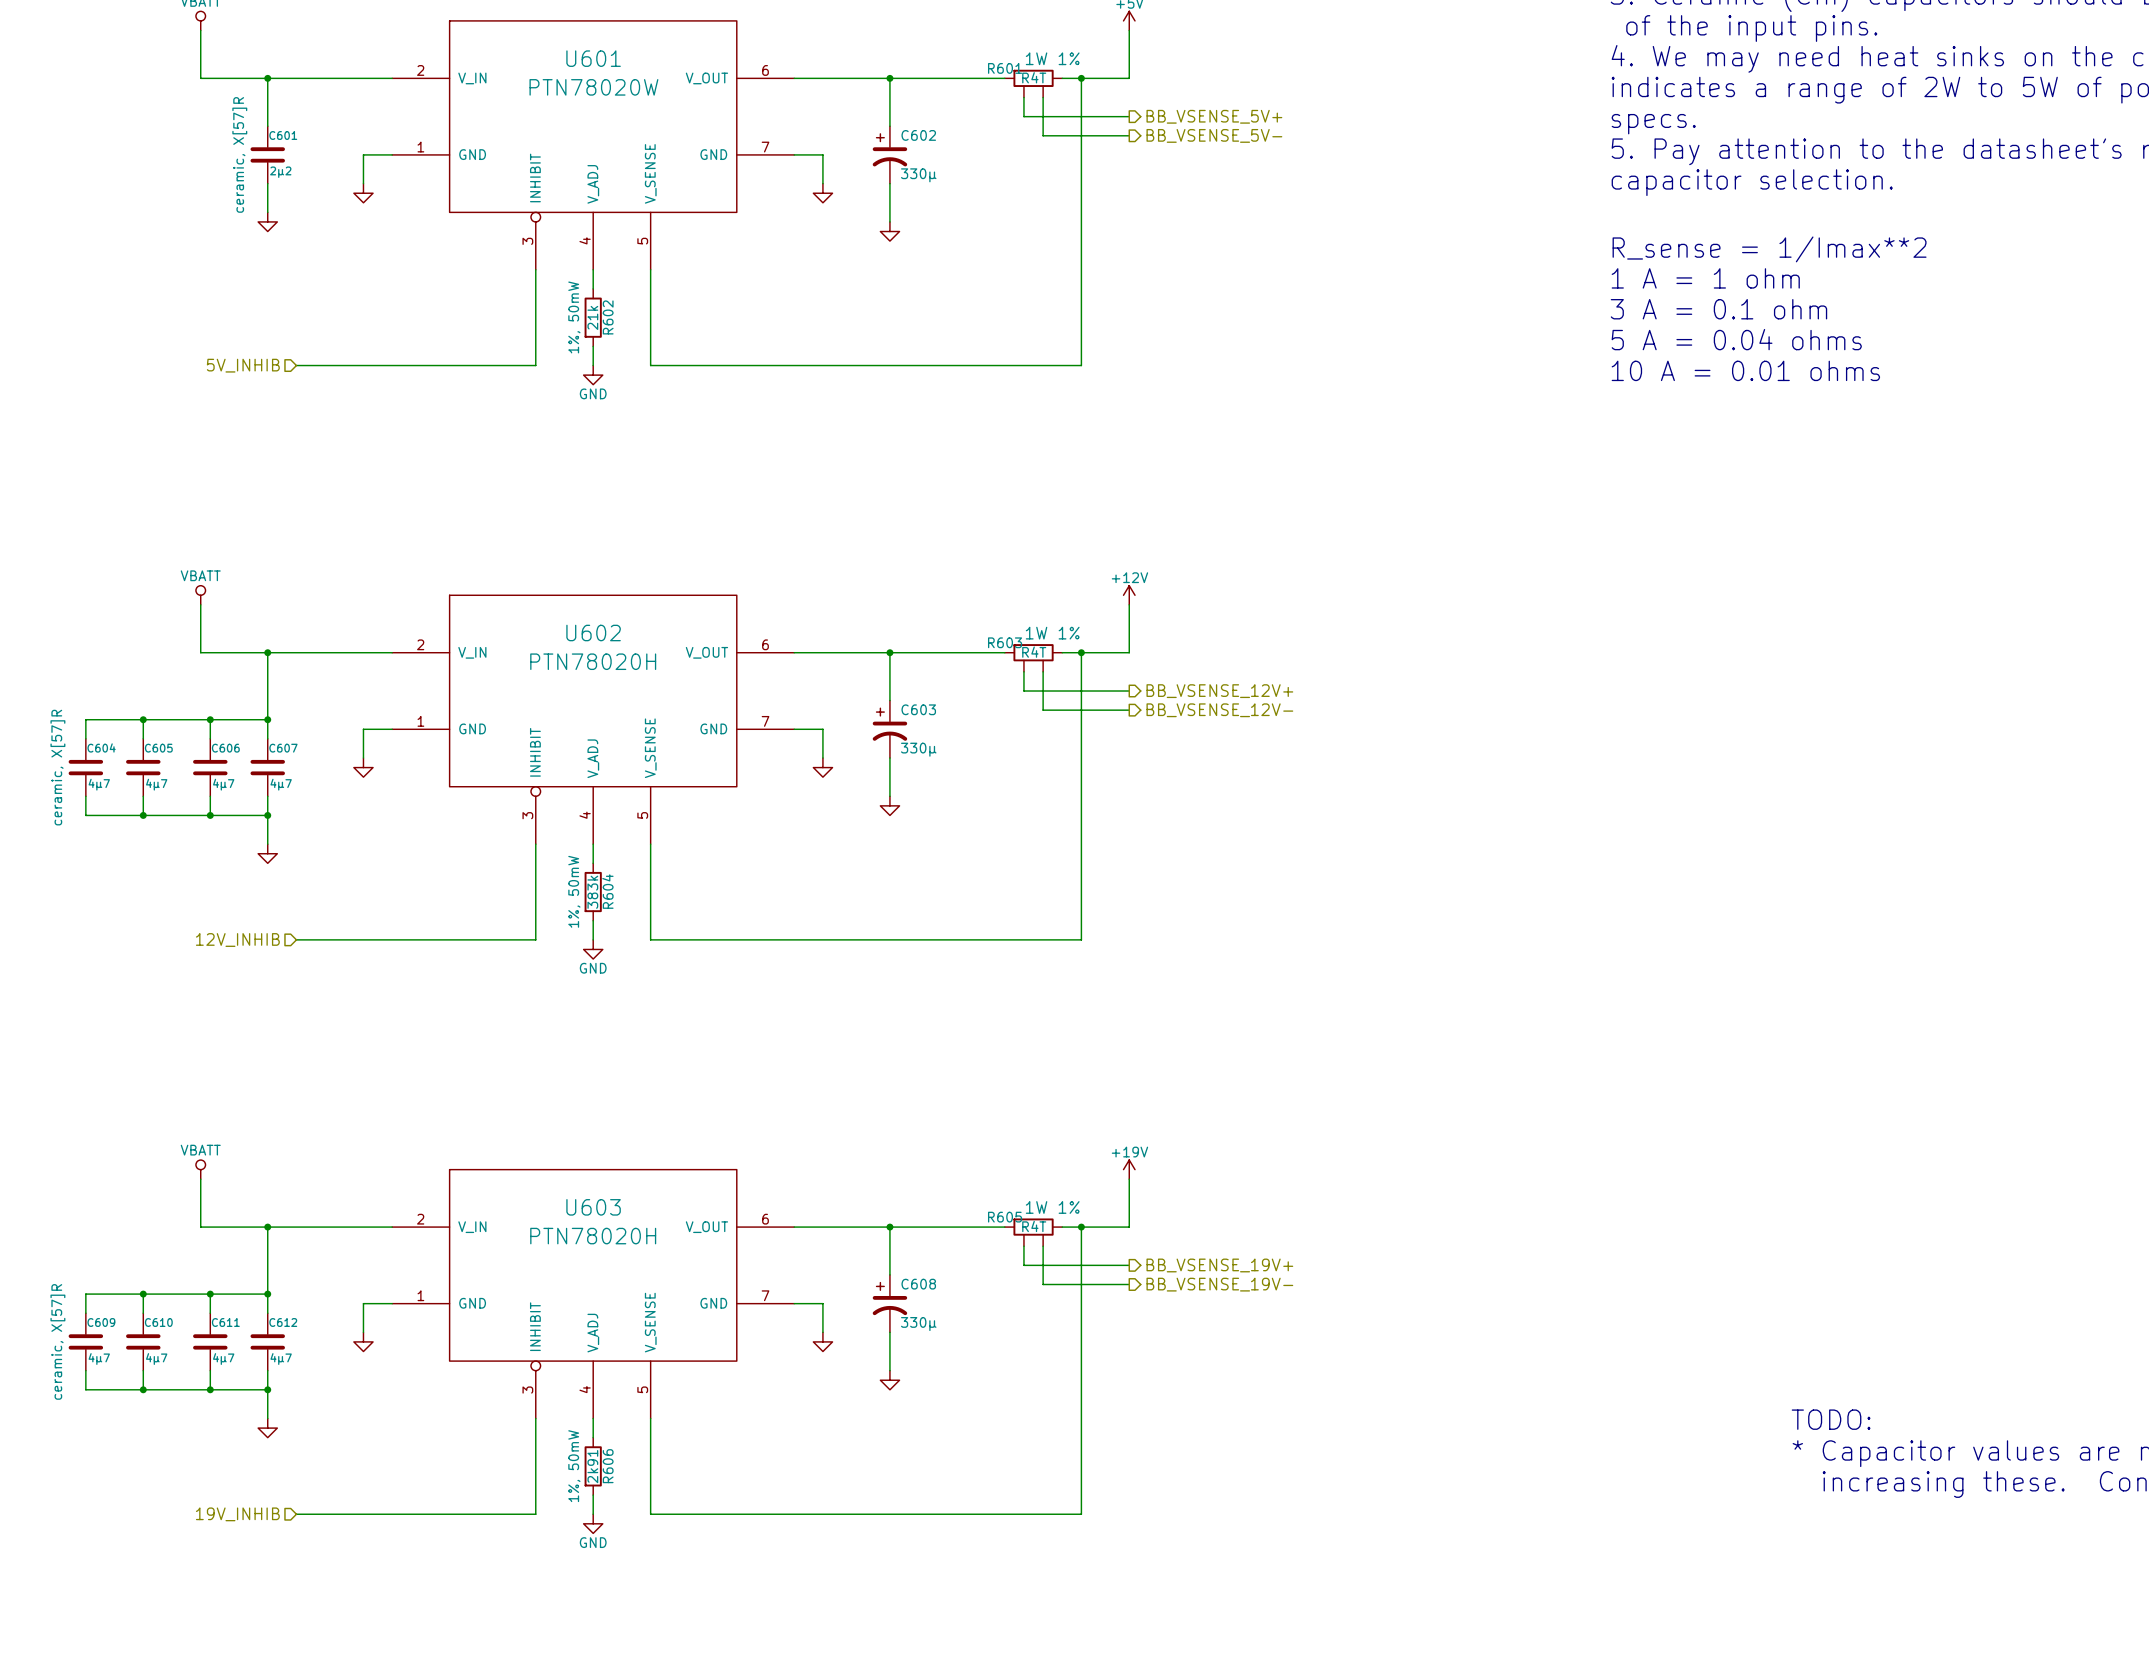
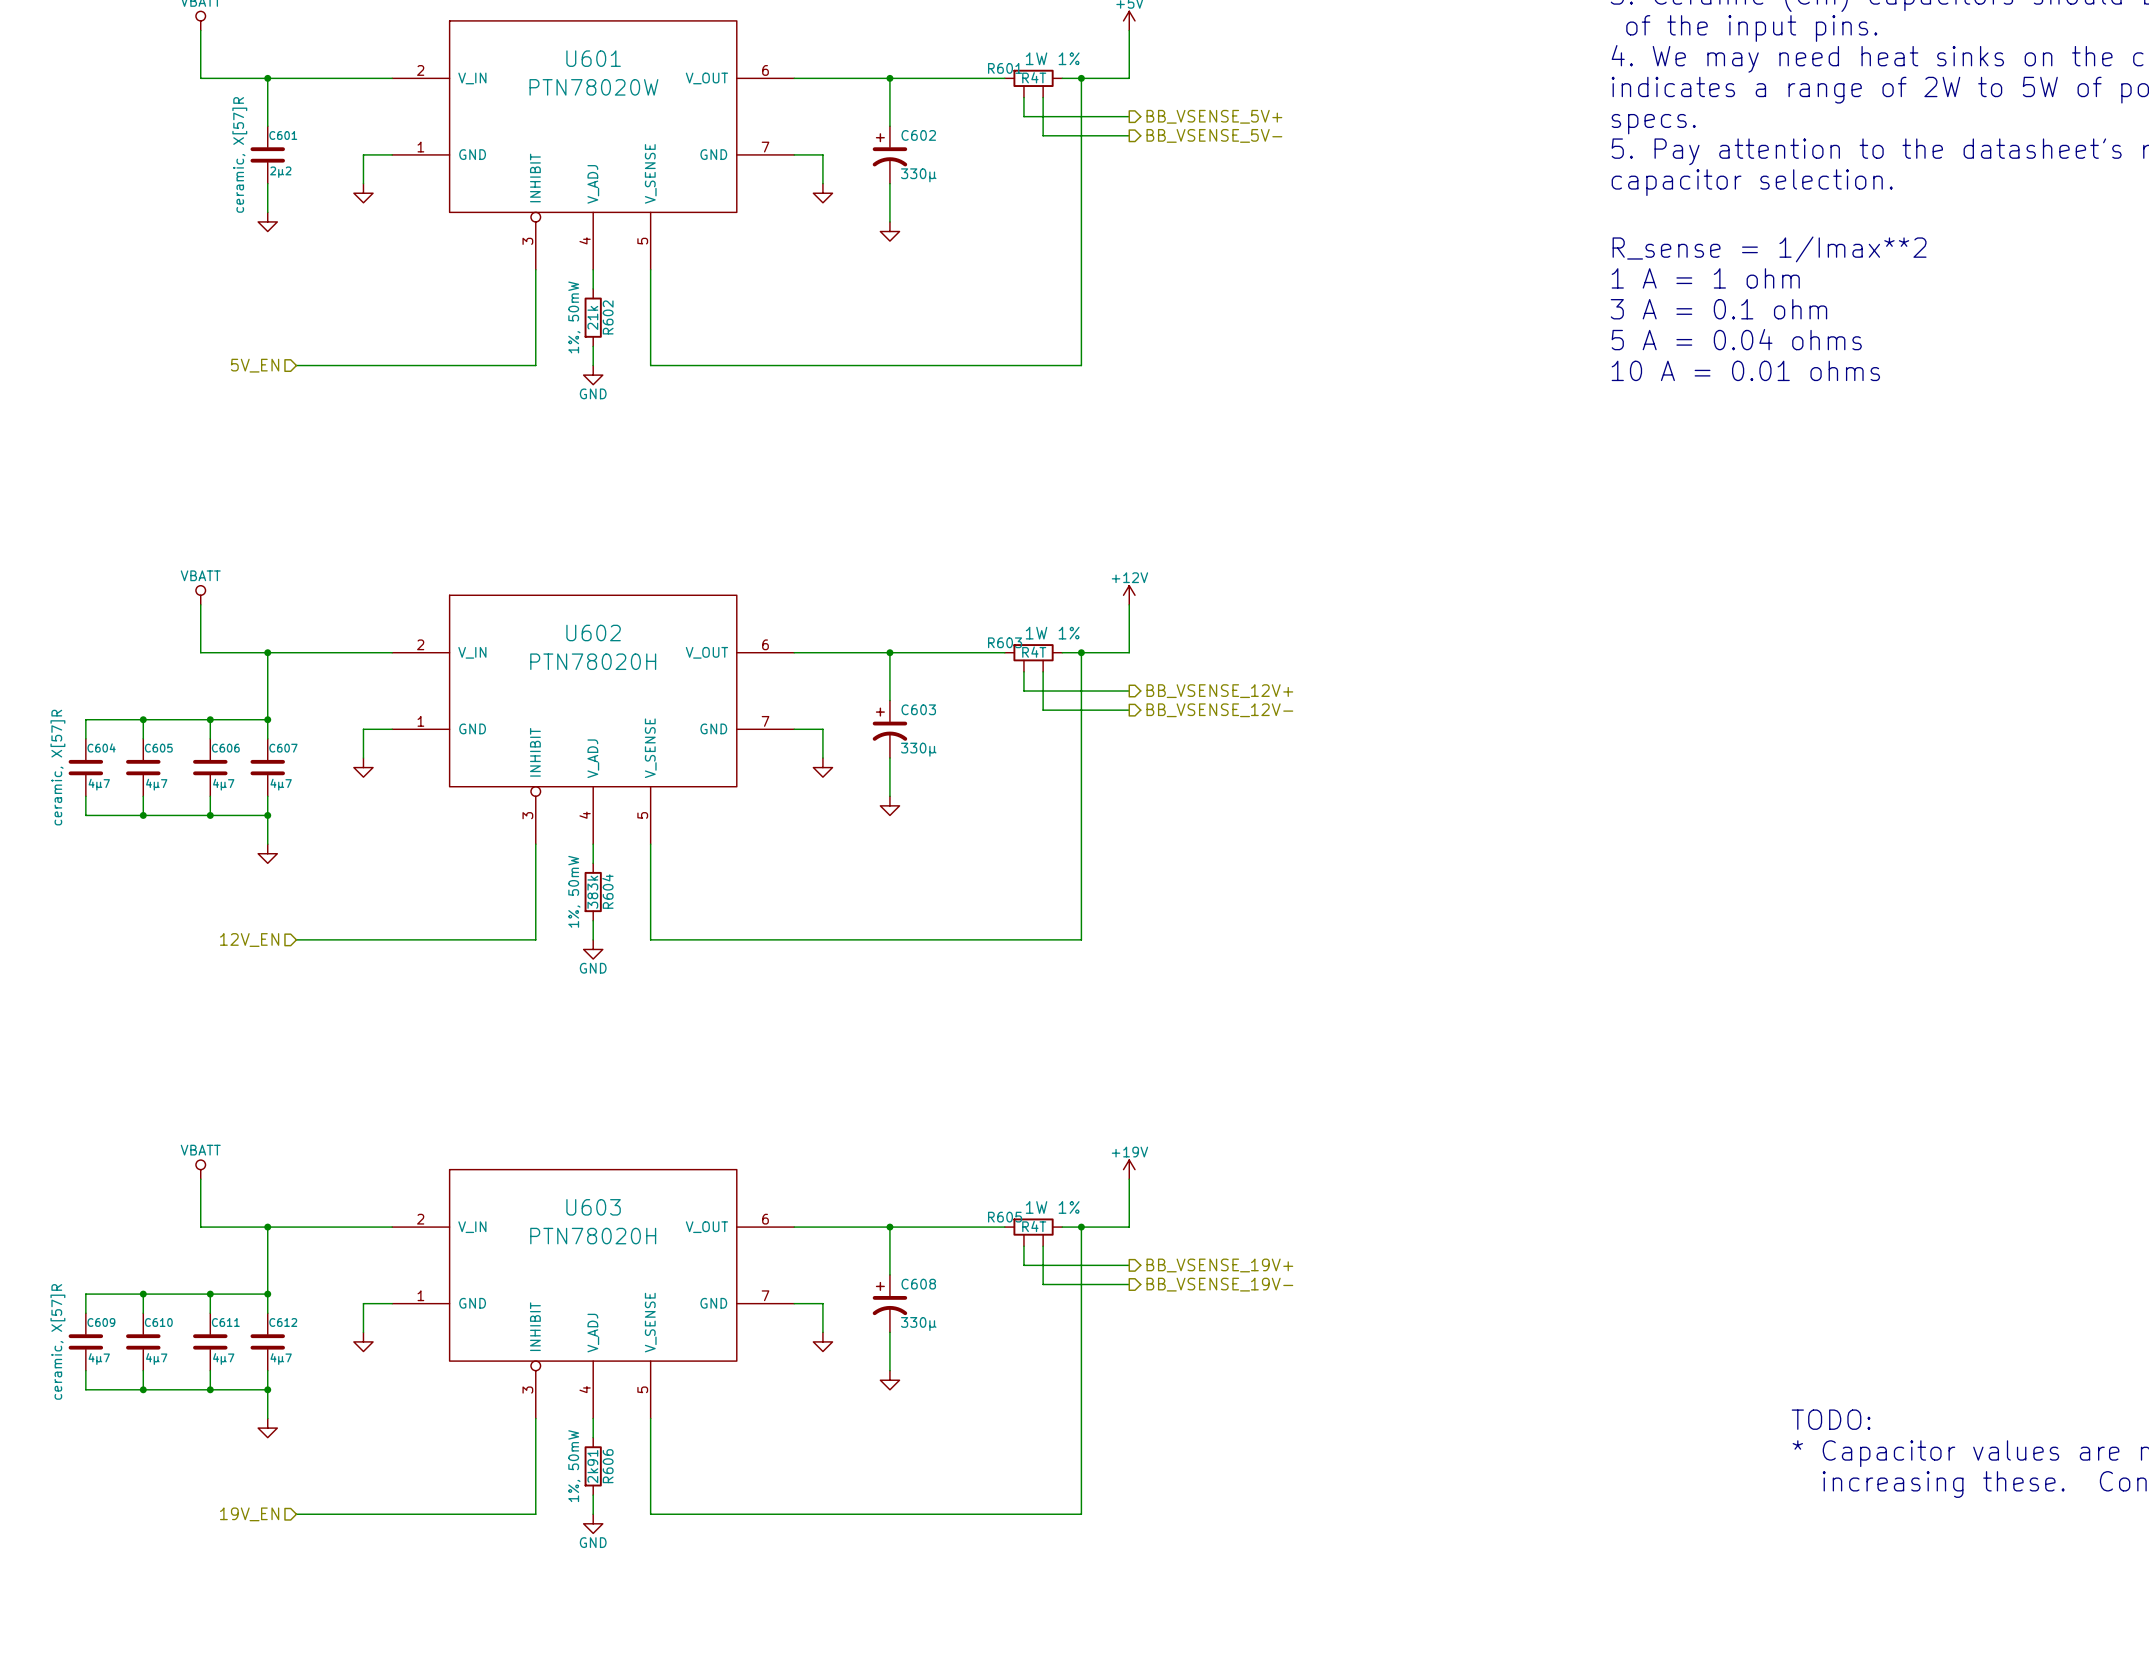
hierarchical label: 5V_INHIB (243, 365) -> 5V_EN (255, 365)
hierarchical label: 12V_INHIB (237, 940) -> 12V_EN (249, 940)
hierarchical label: 19V_INHIB (237, 1514) -> 19V_EN (249, 1514)

